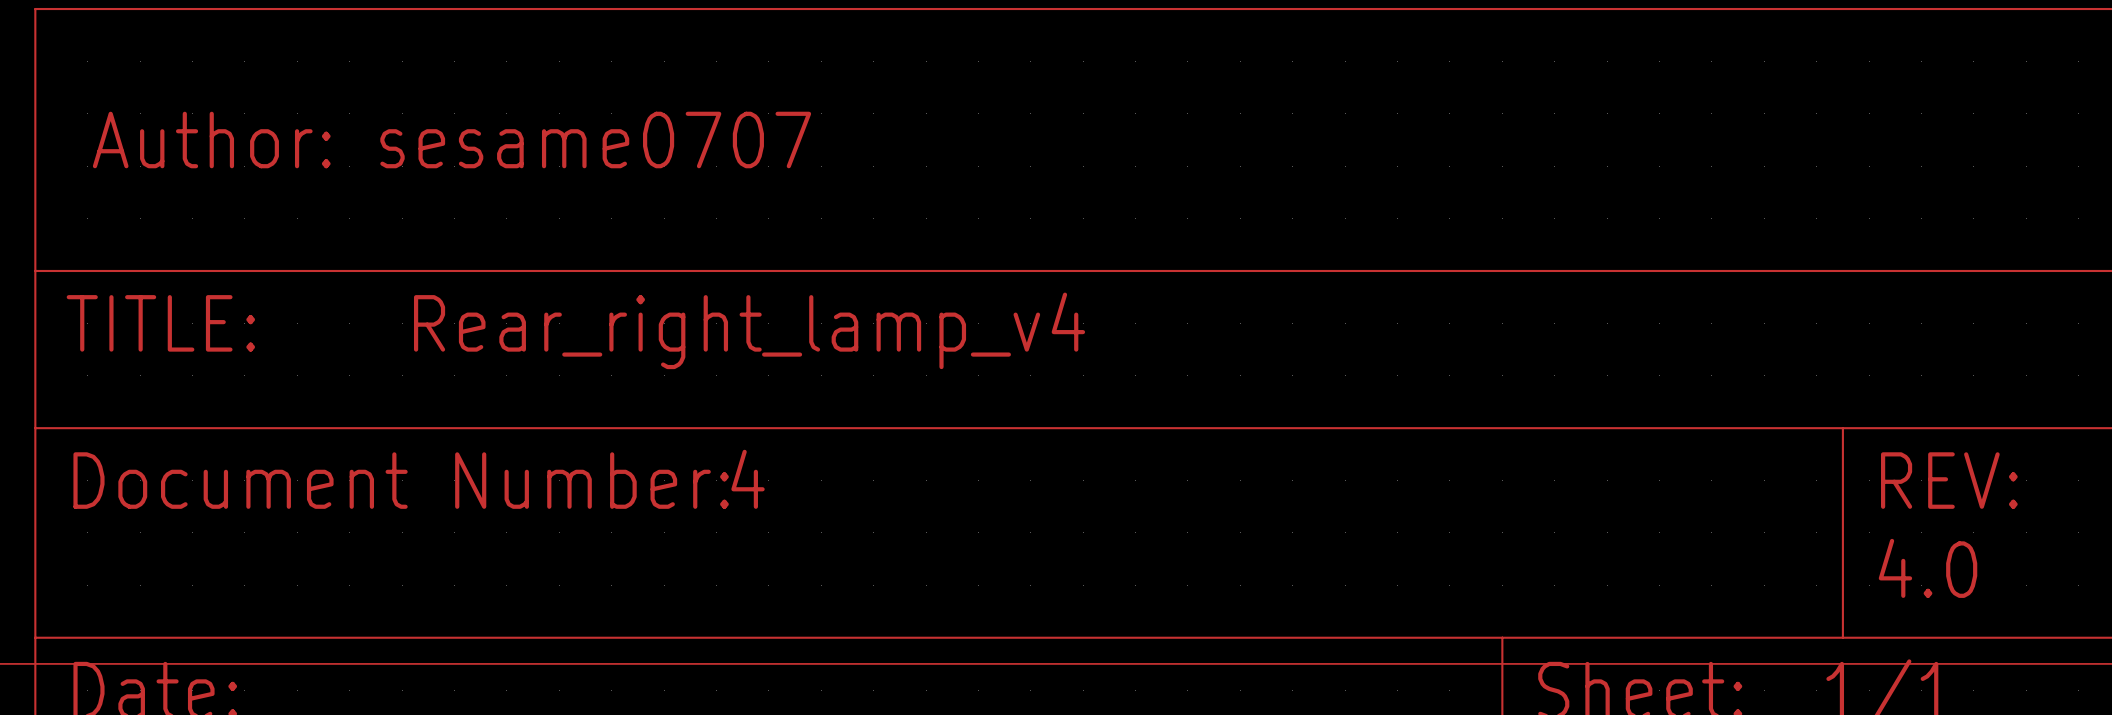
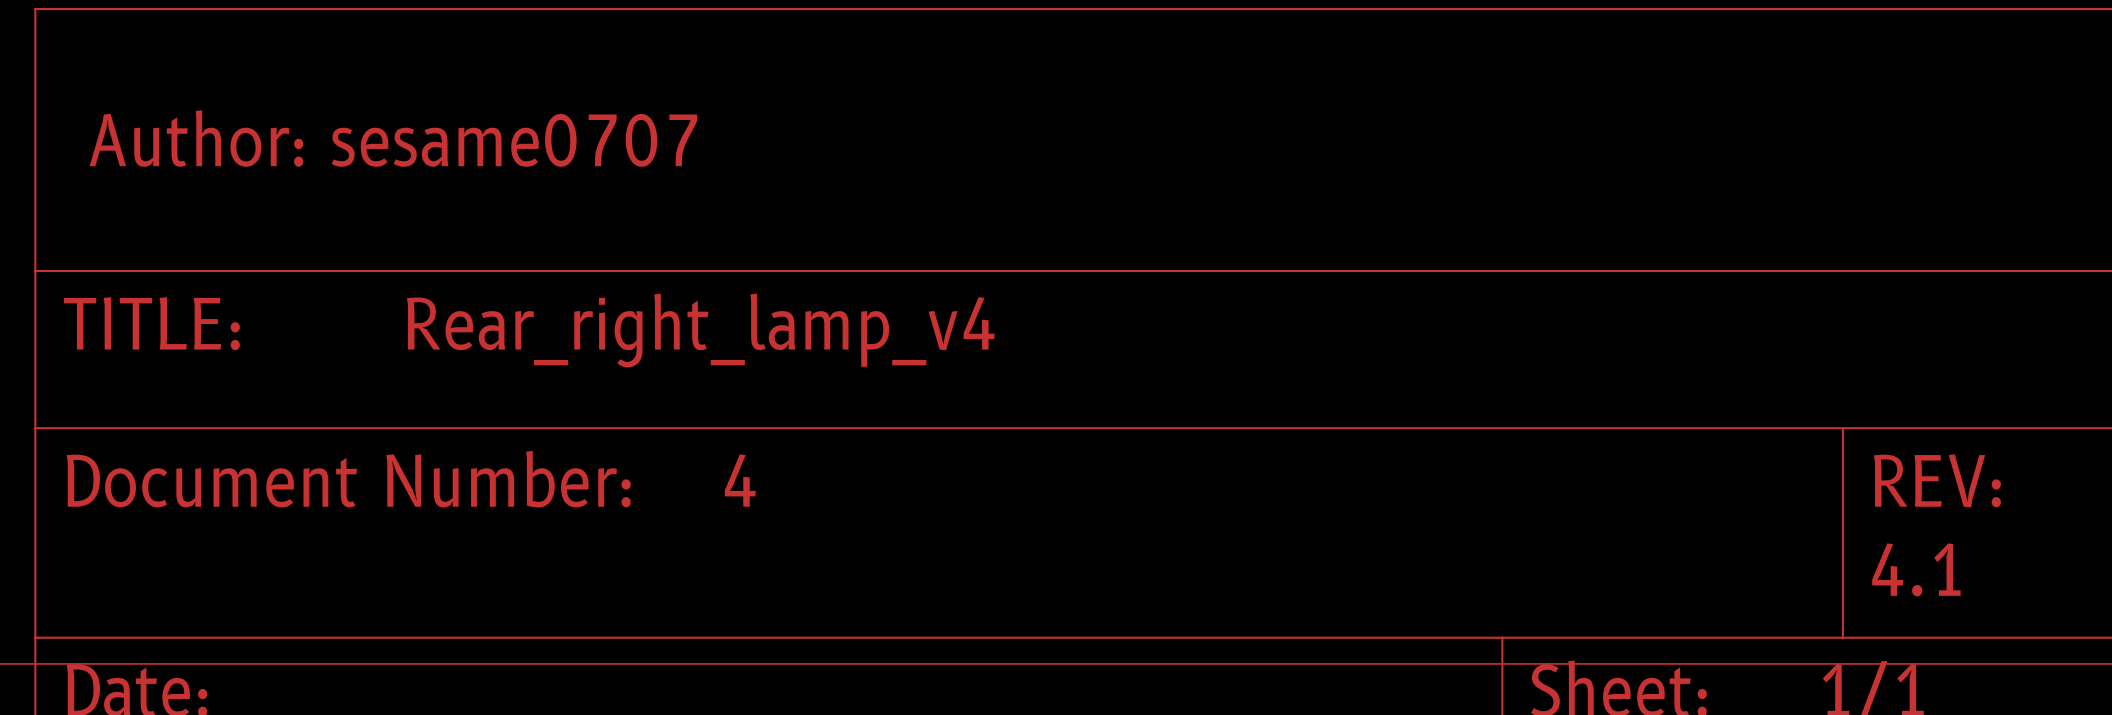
text: 4.0 (1928, 568) -> 4.1 (1916, 569)

